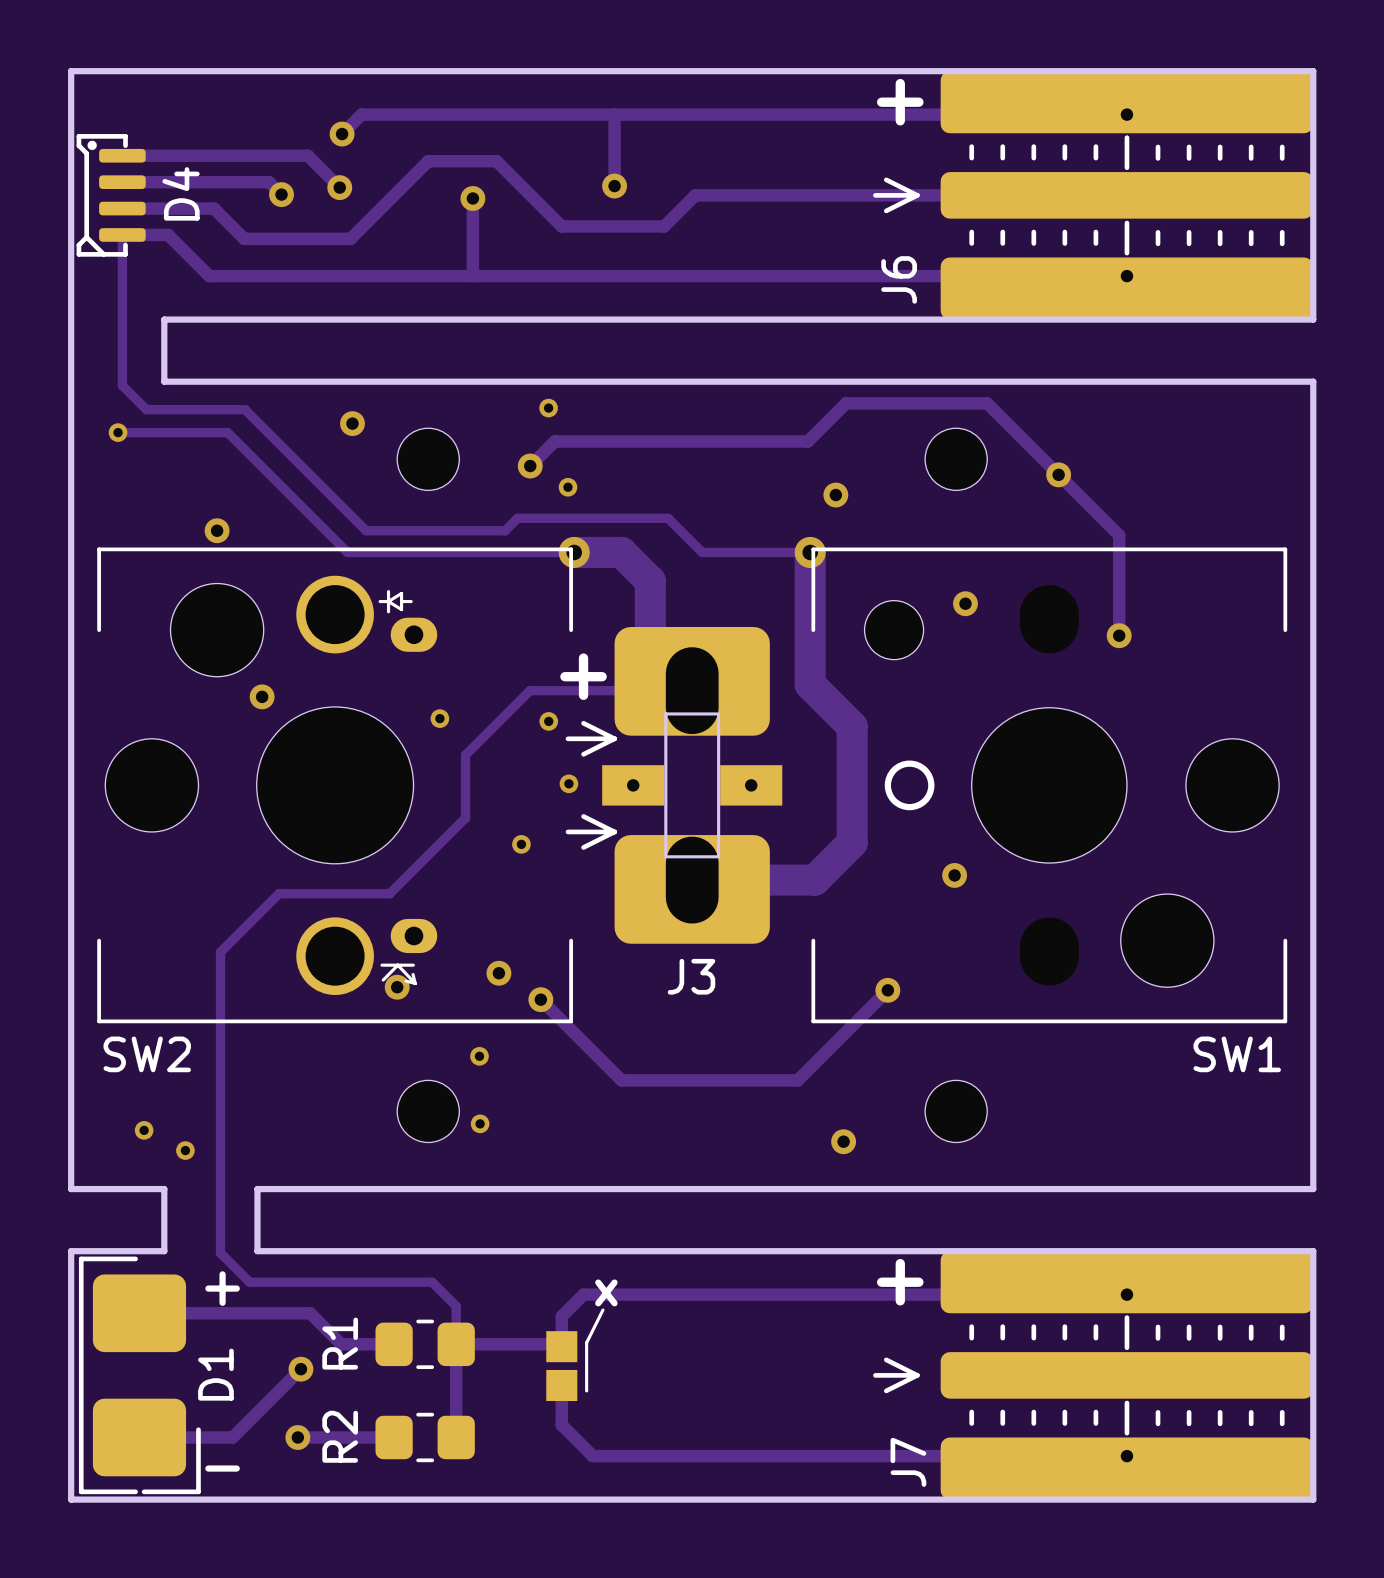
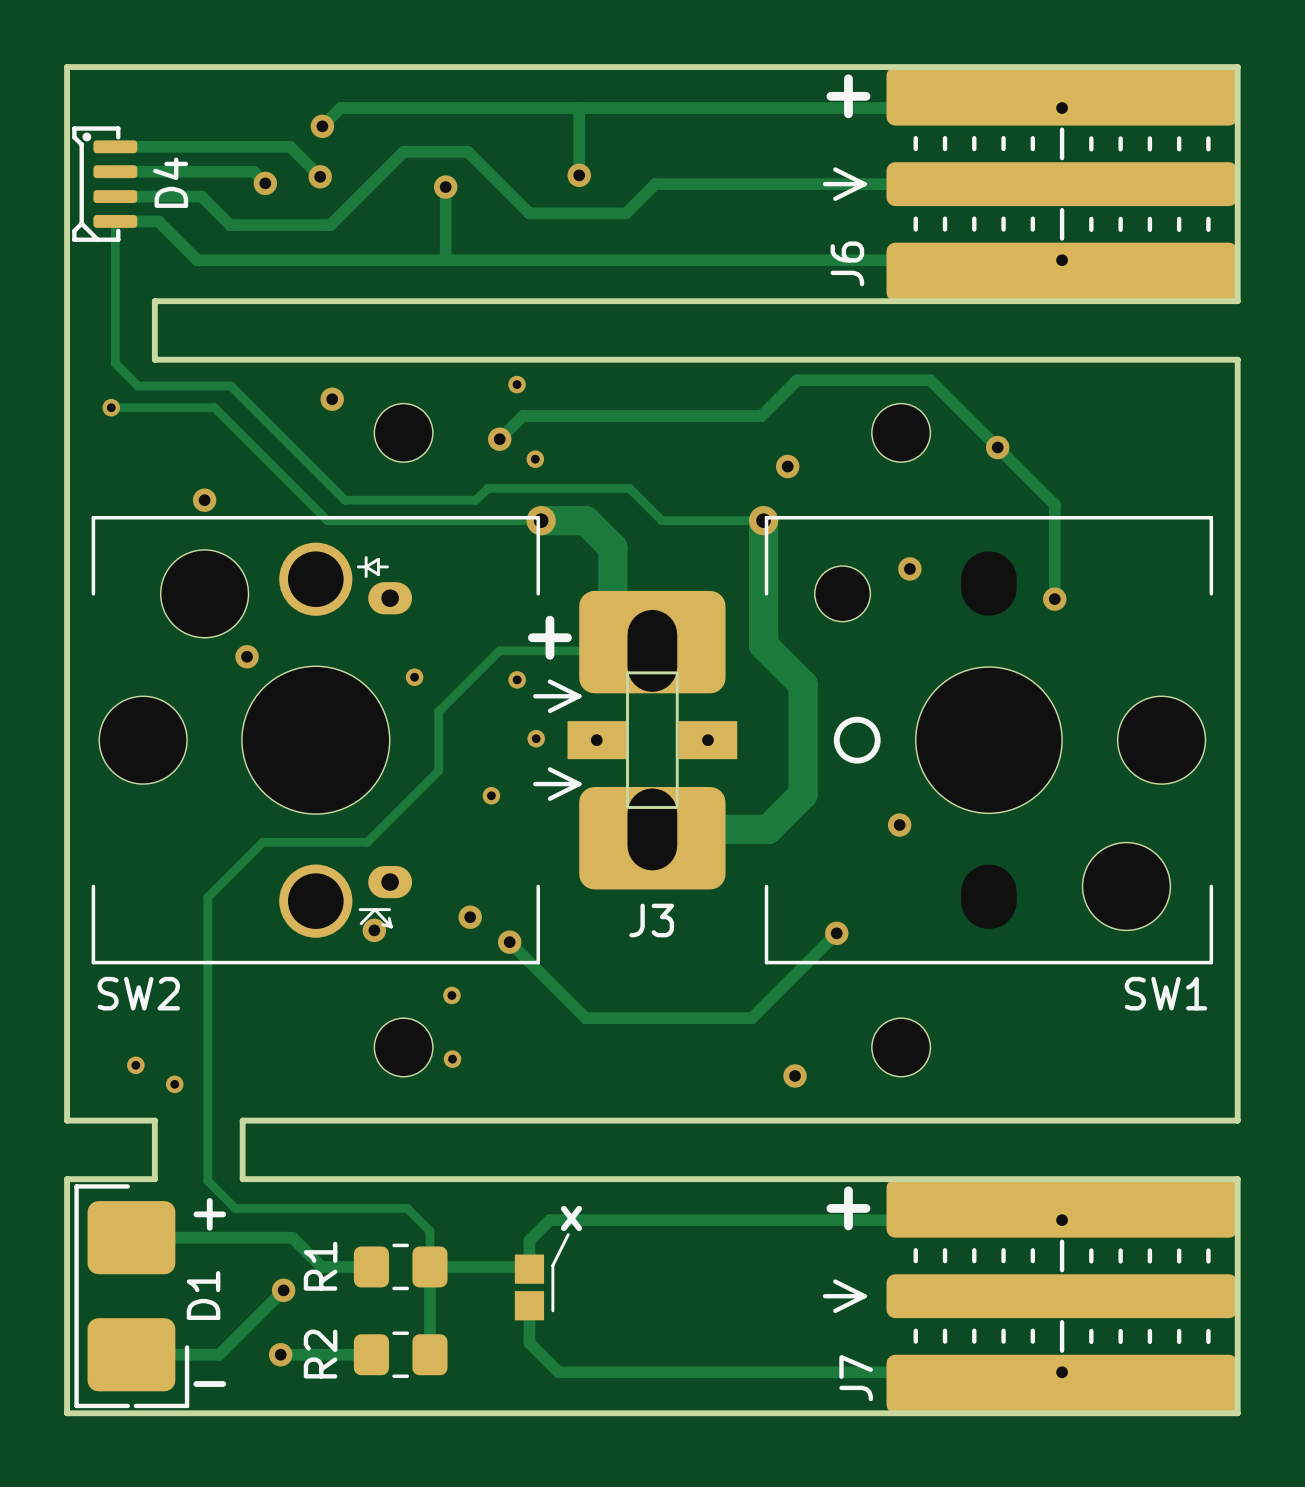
SW1 footprint: [811, 547, 1288, 1024] -> [764, 515, 1214, 965]

